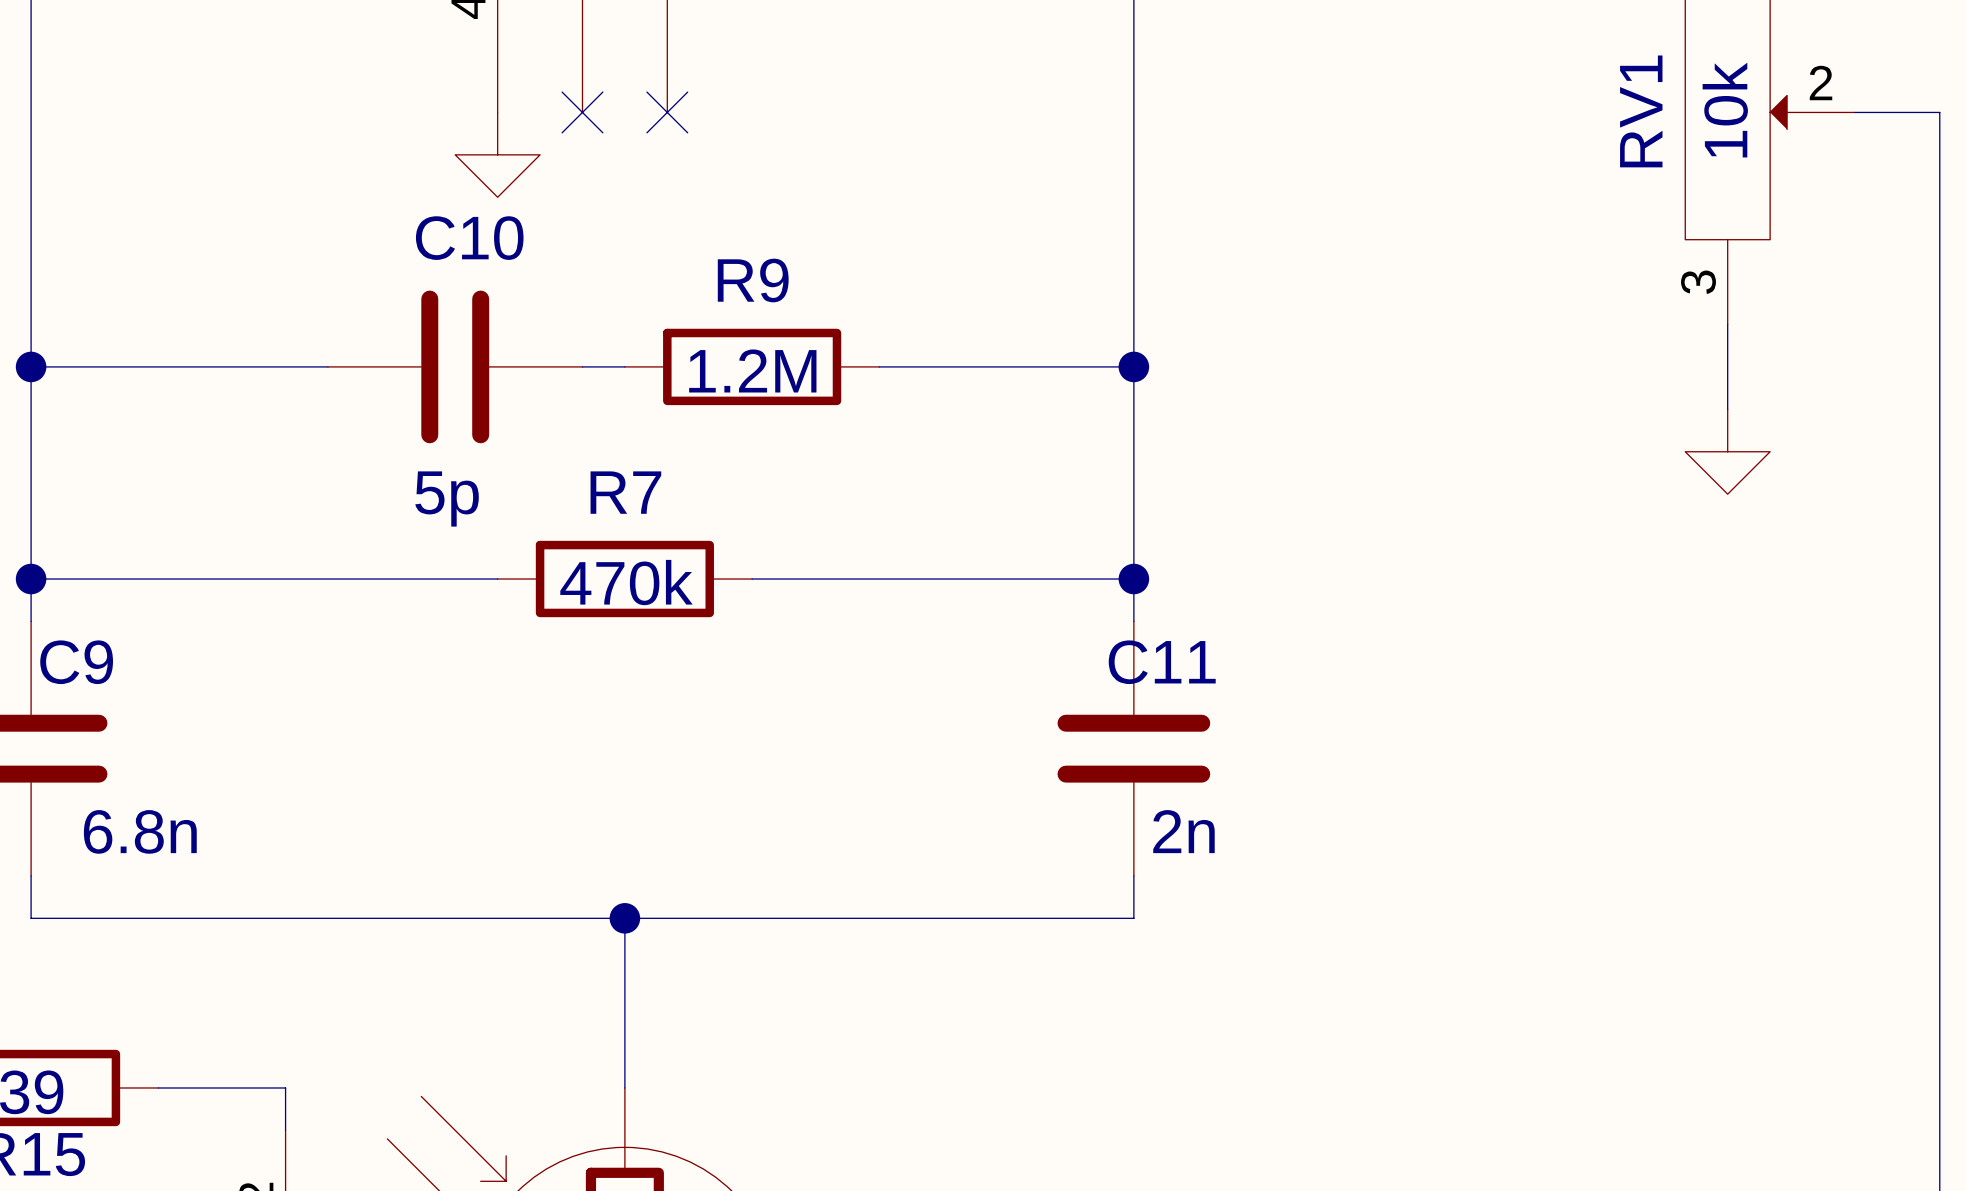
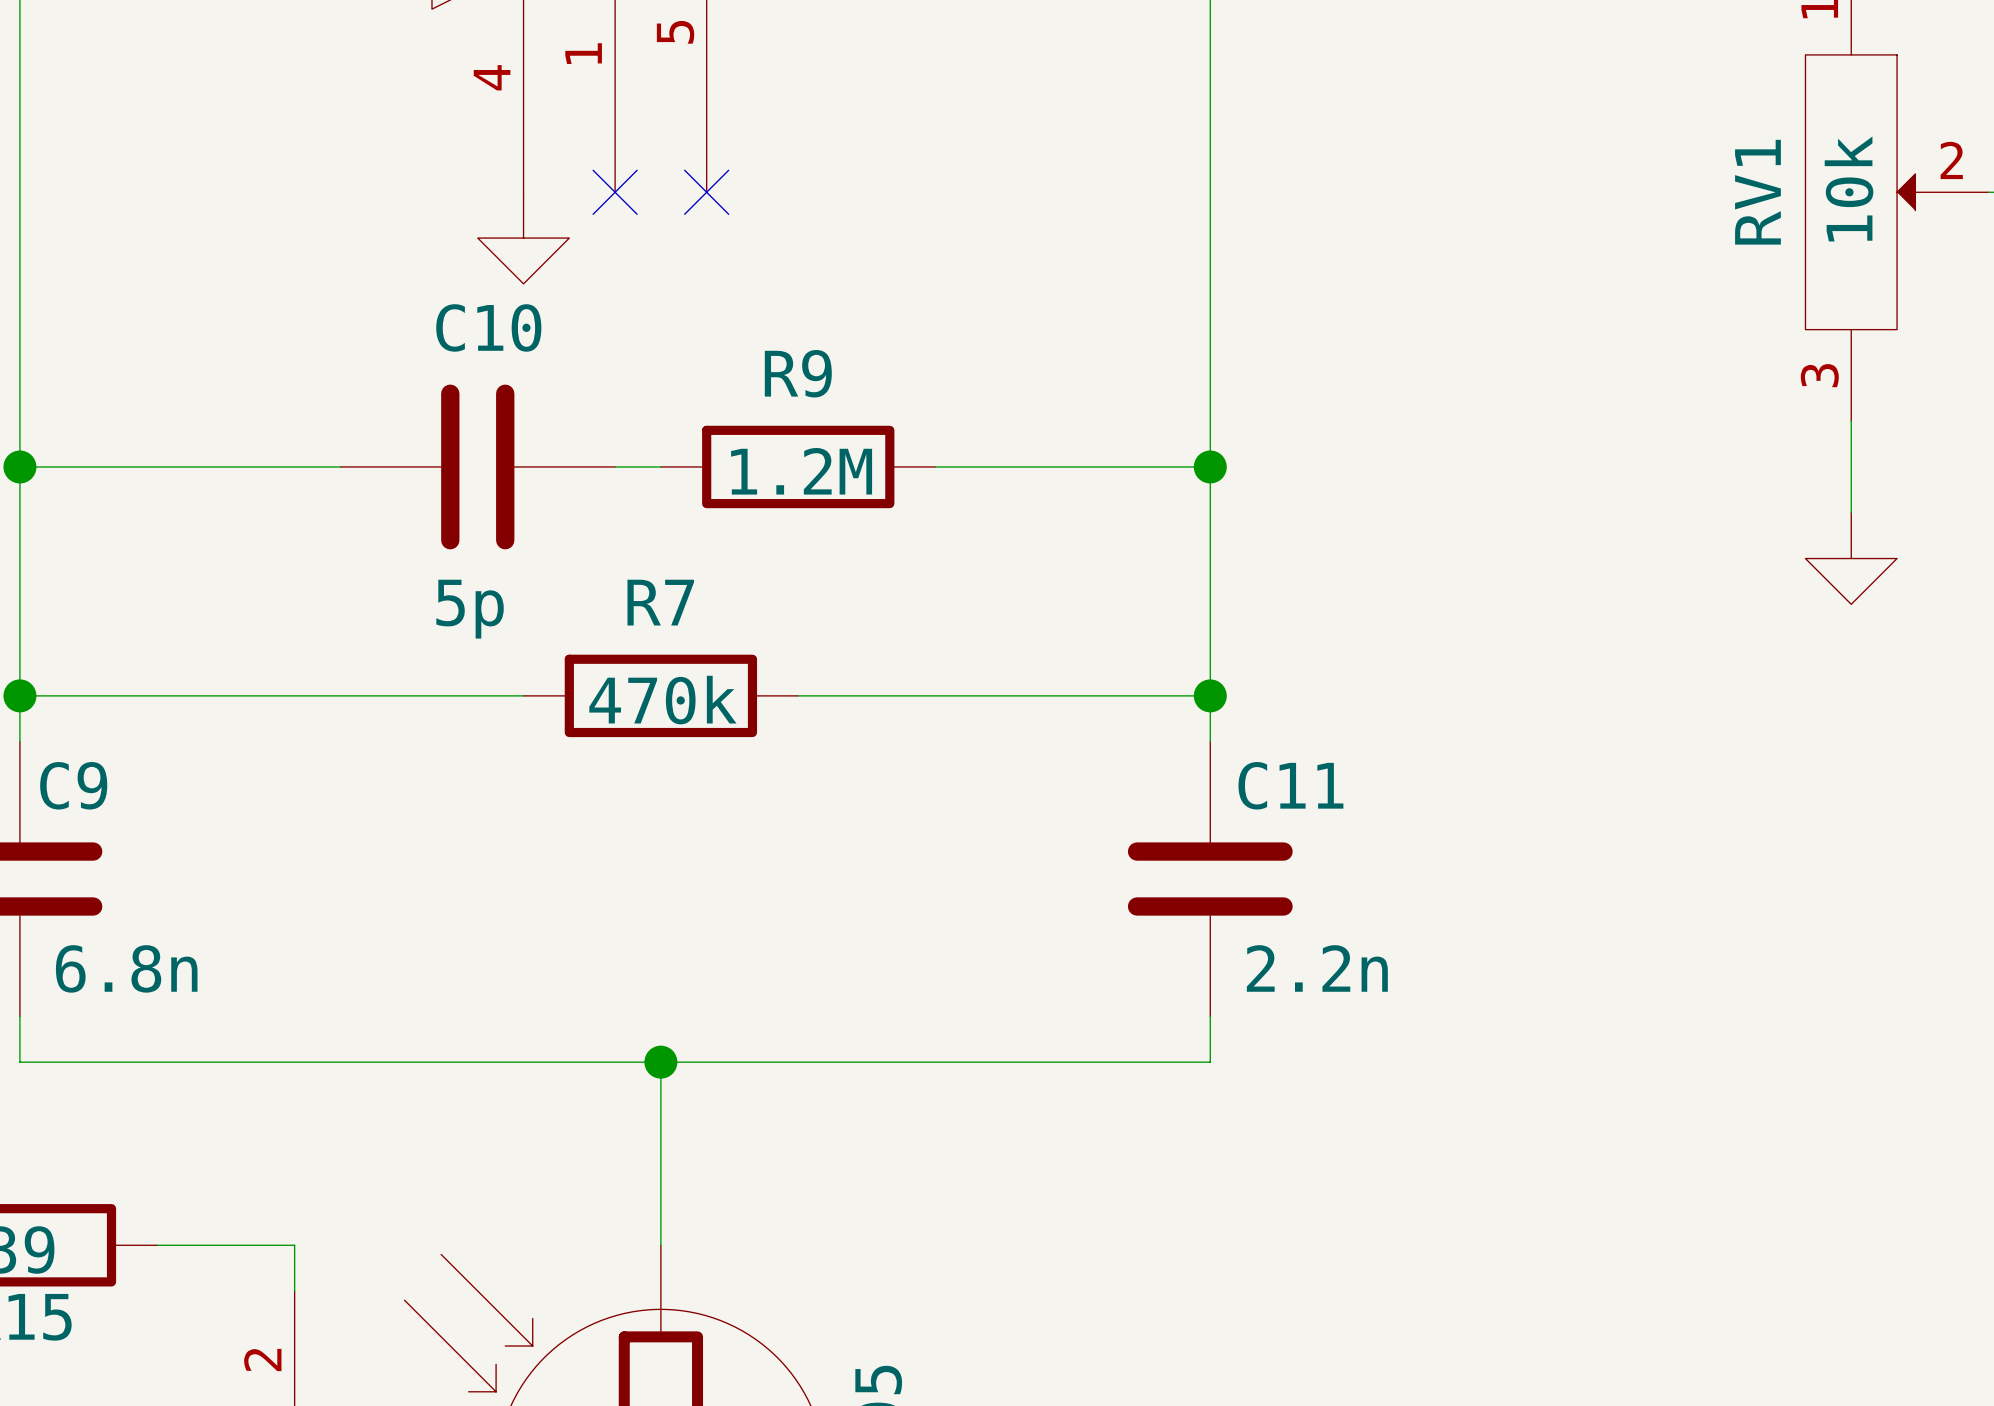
C11 name position: C11 (1162, 662) -> C11 (1290, 785)
C11 value: 2n (1183, 831) -> 2.2n (1317, 968)

